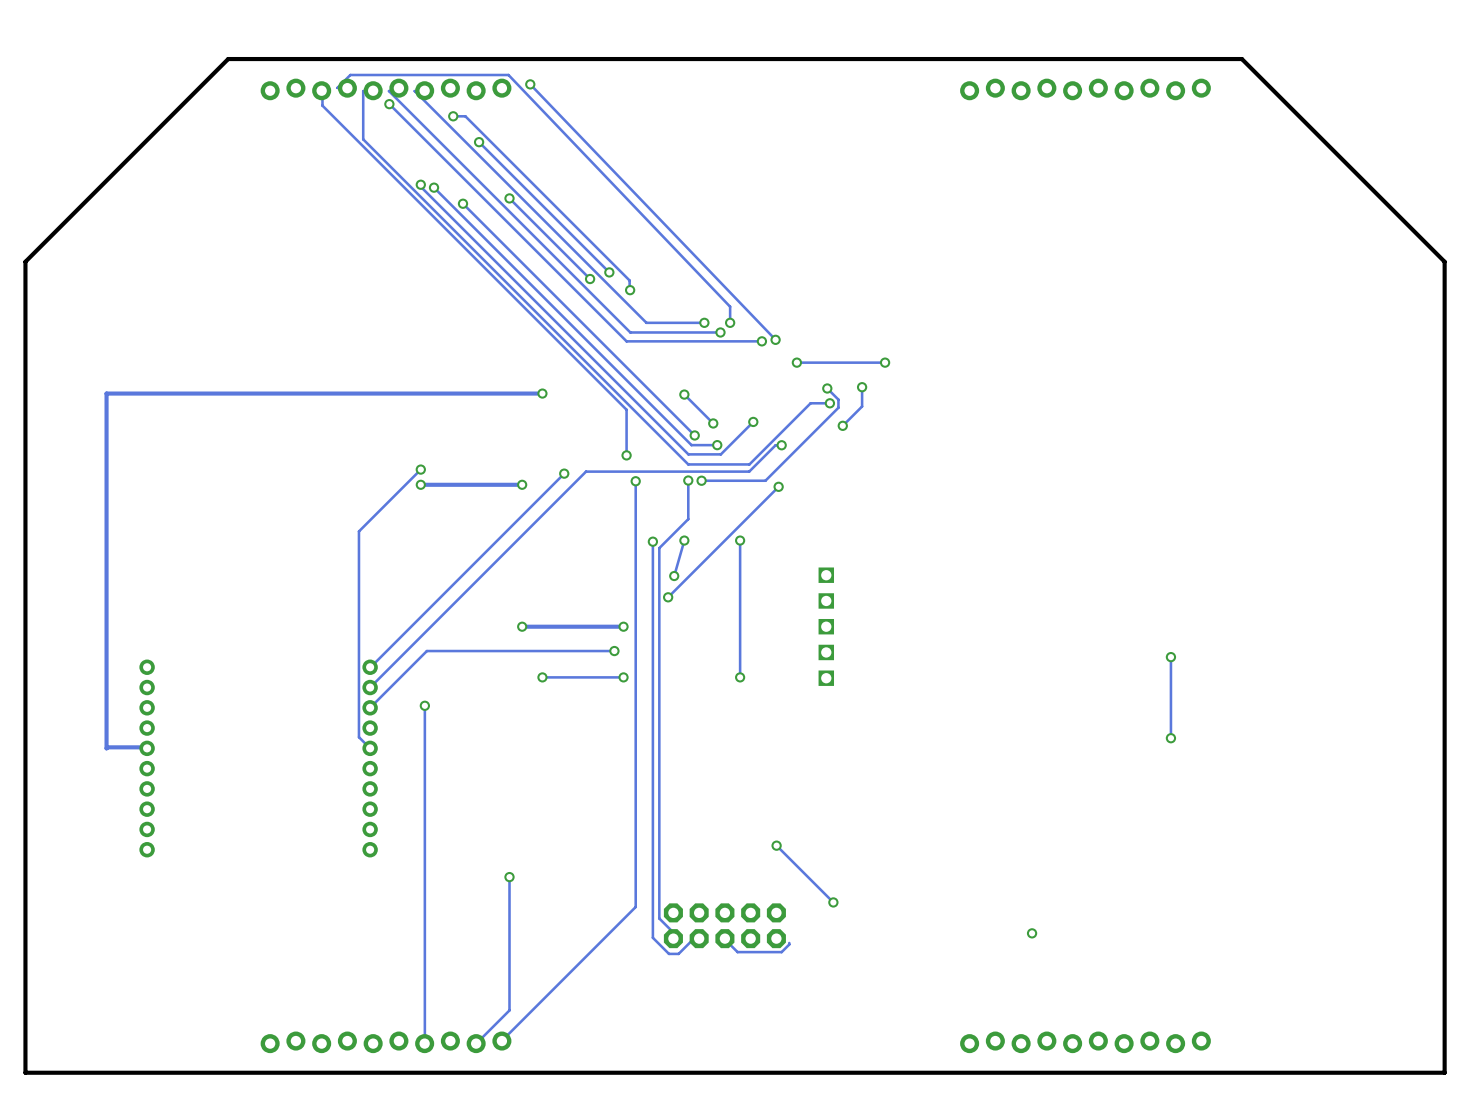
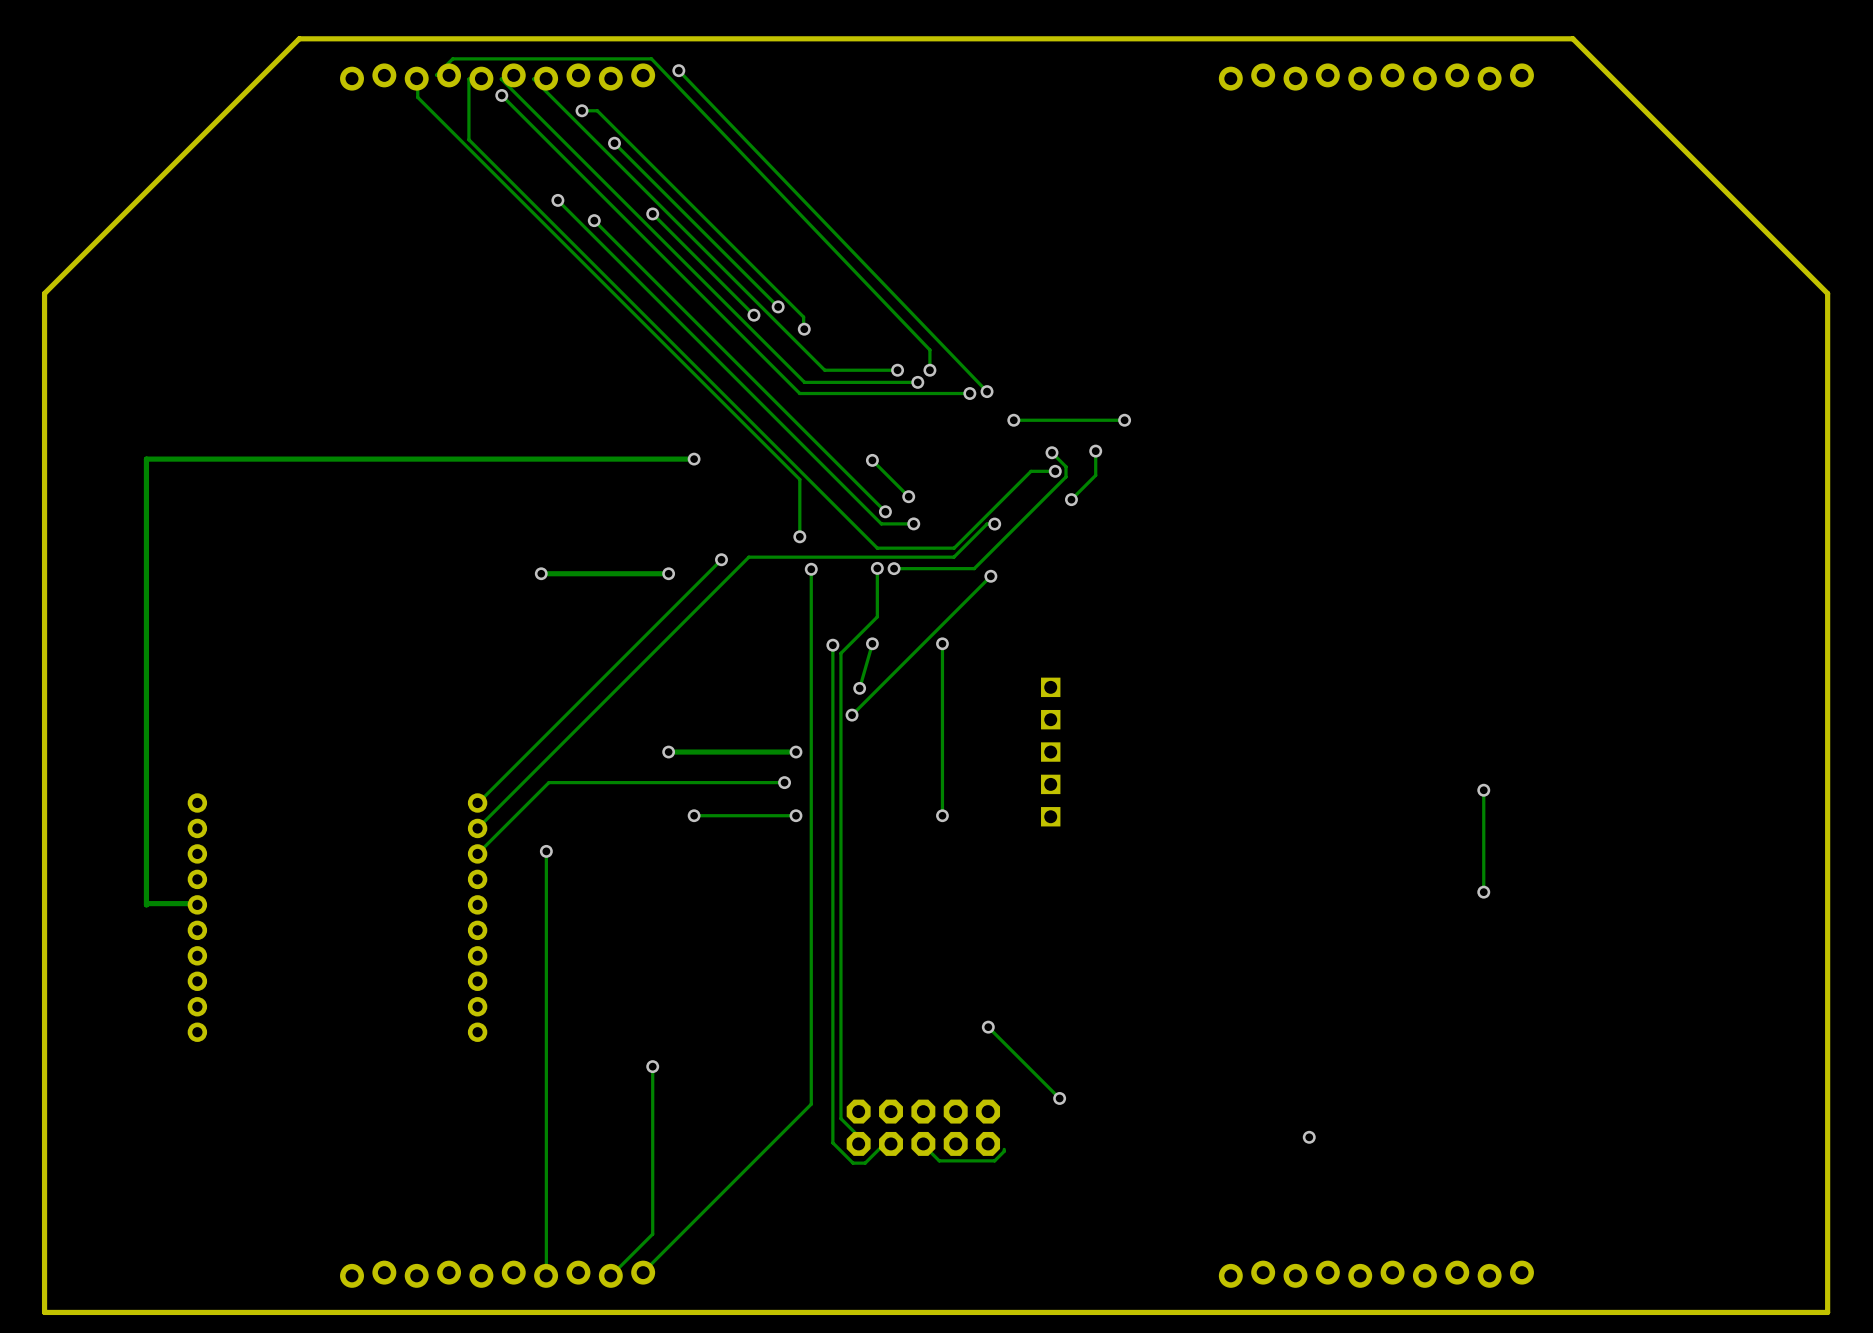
track: (420, 184) (688, 454) (720, 454) (753, 421) -> none
via: (420, 184) -> none
via: (753, 421) -> none
track: (420, 469) (358, 531) (358, 737) (370, 748) -> none
via: (420, 469) -> none

